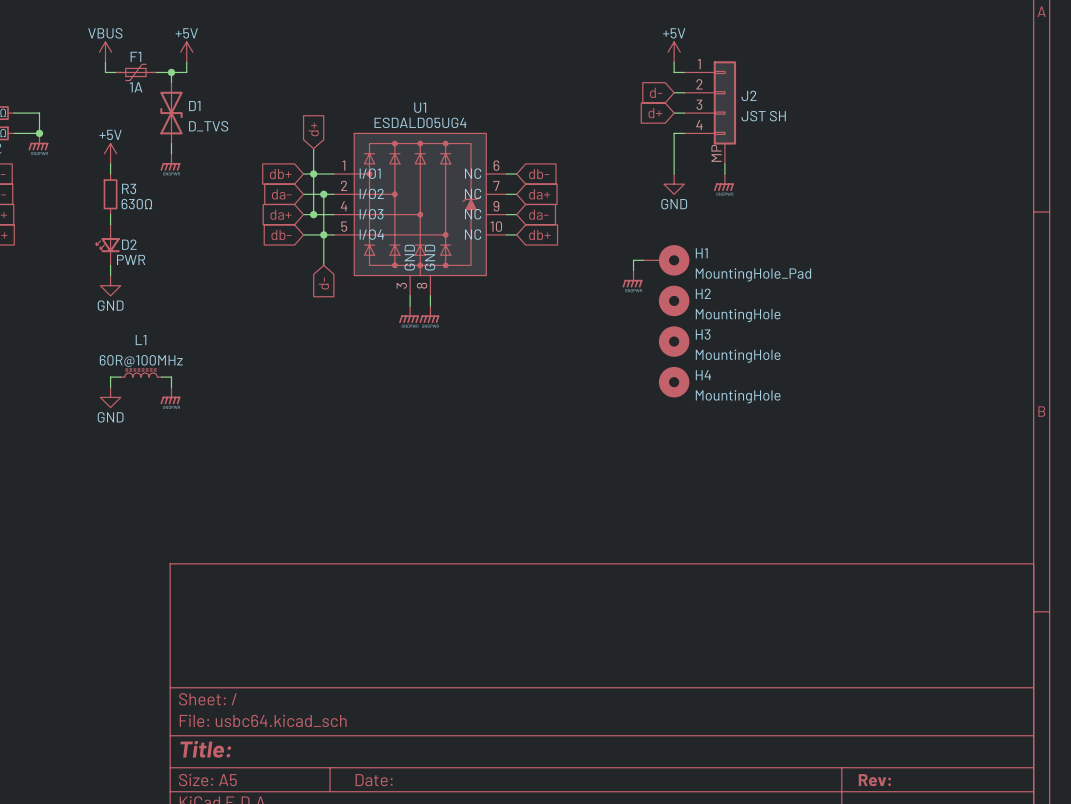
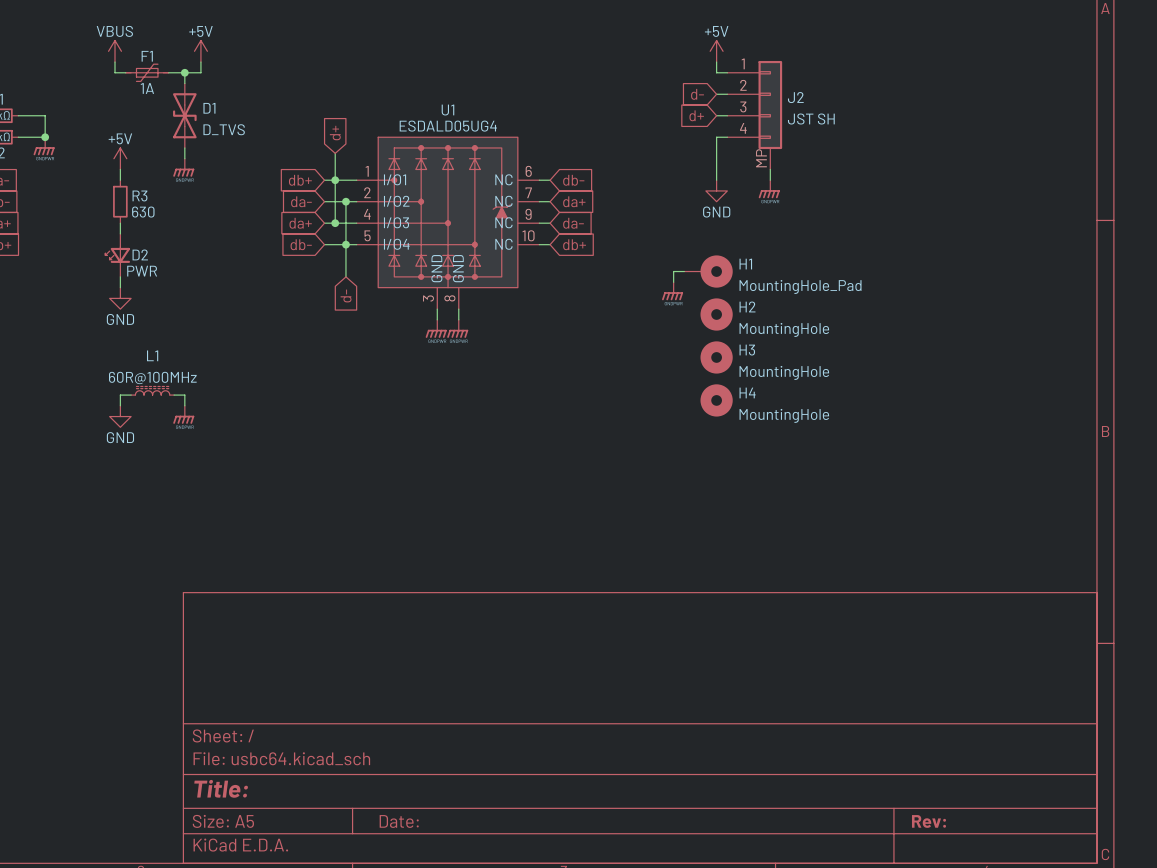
R3 value: 630Ω (136, 204) -> 630 (143, 212)

